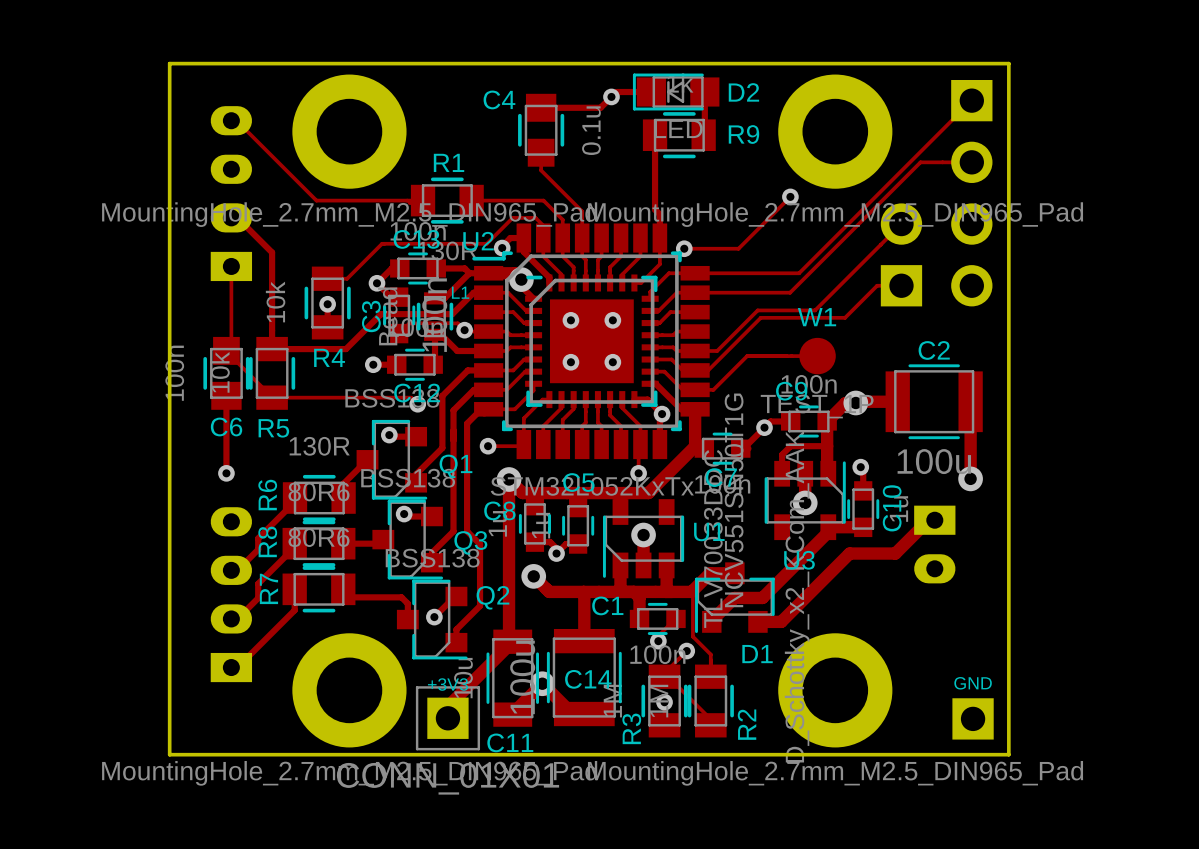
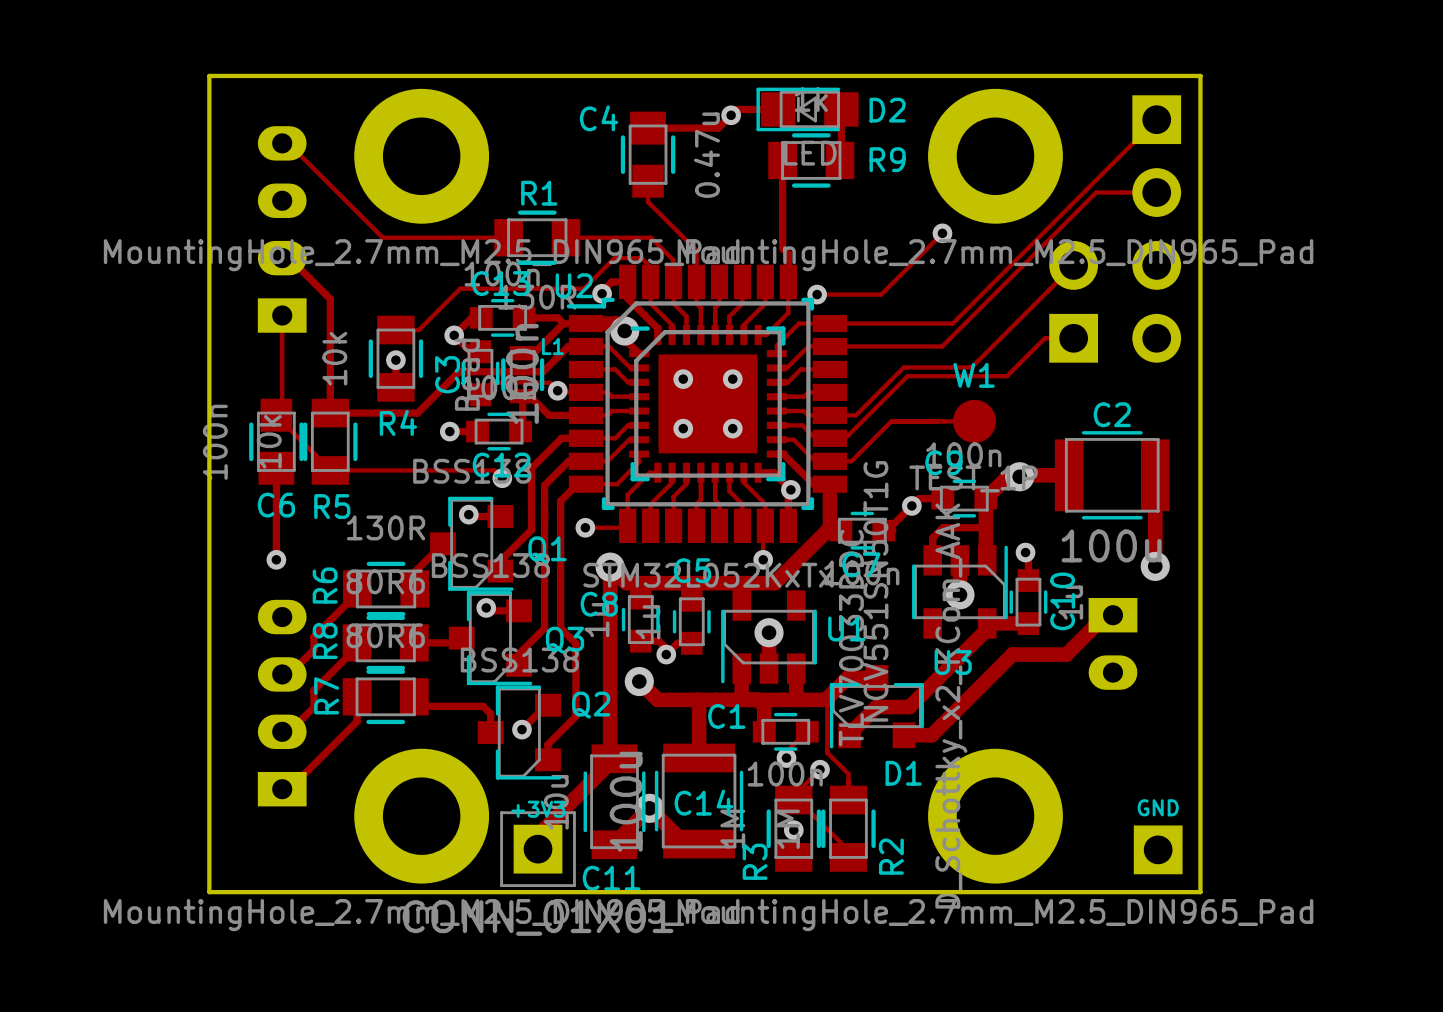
C4 value: 0.1u (591, 130) -> 0.47u (706, 155)

